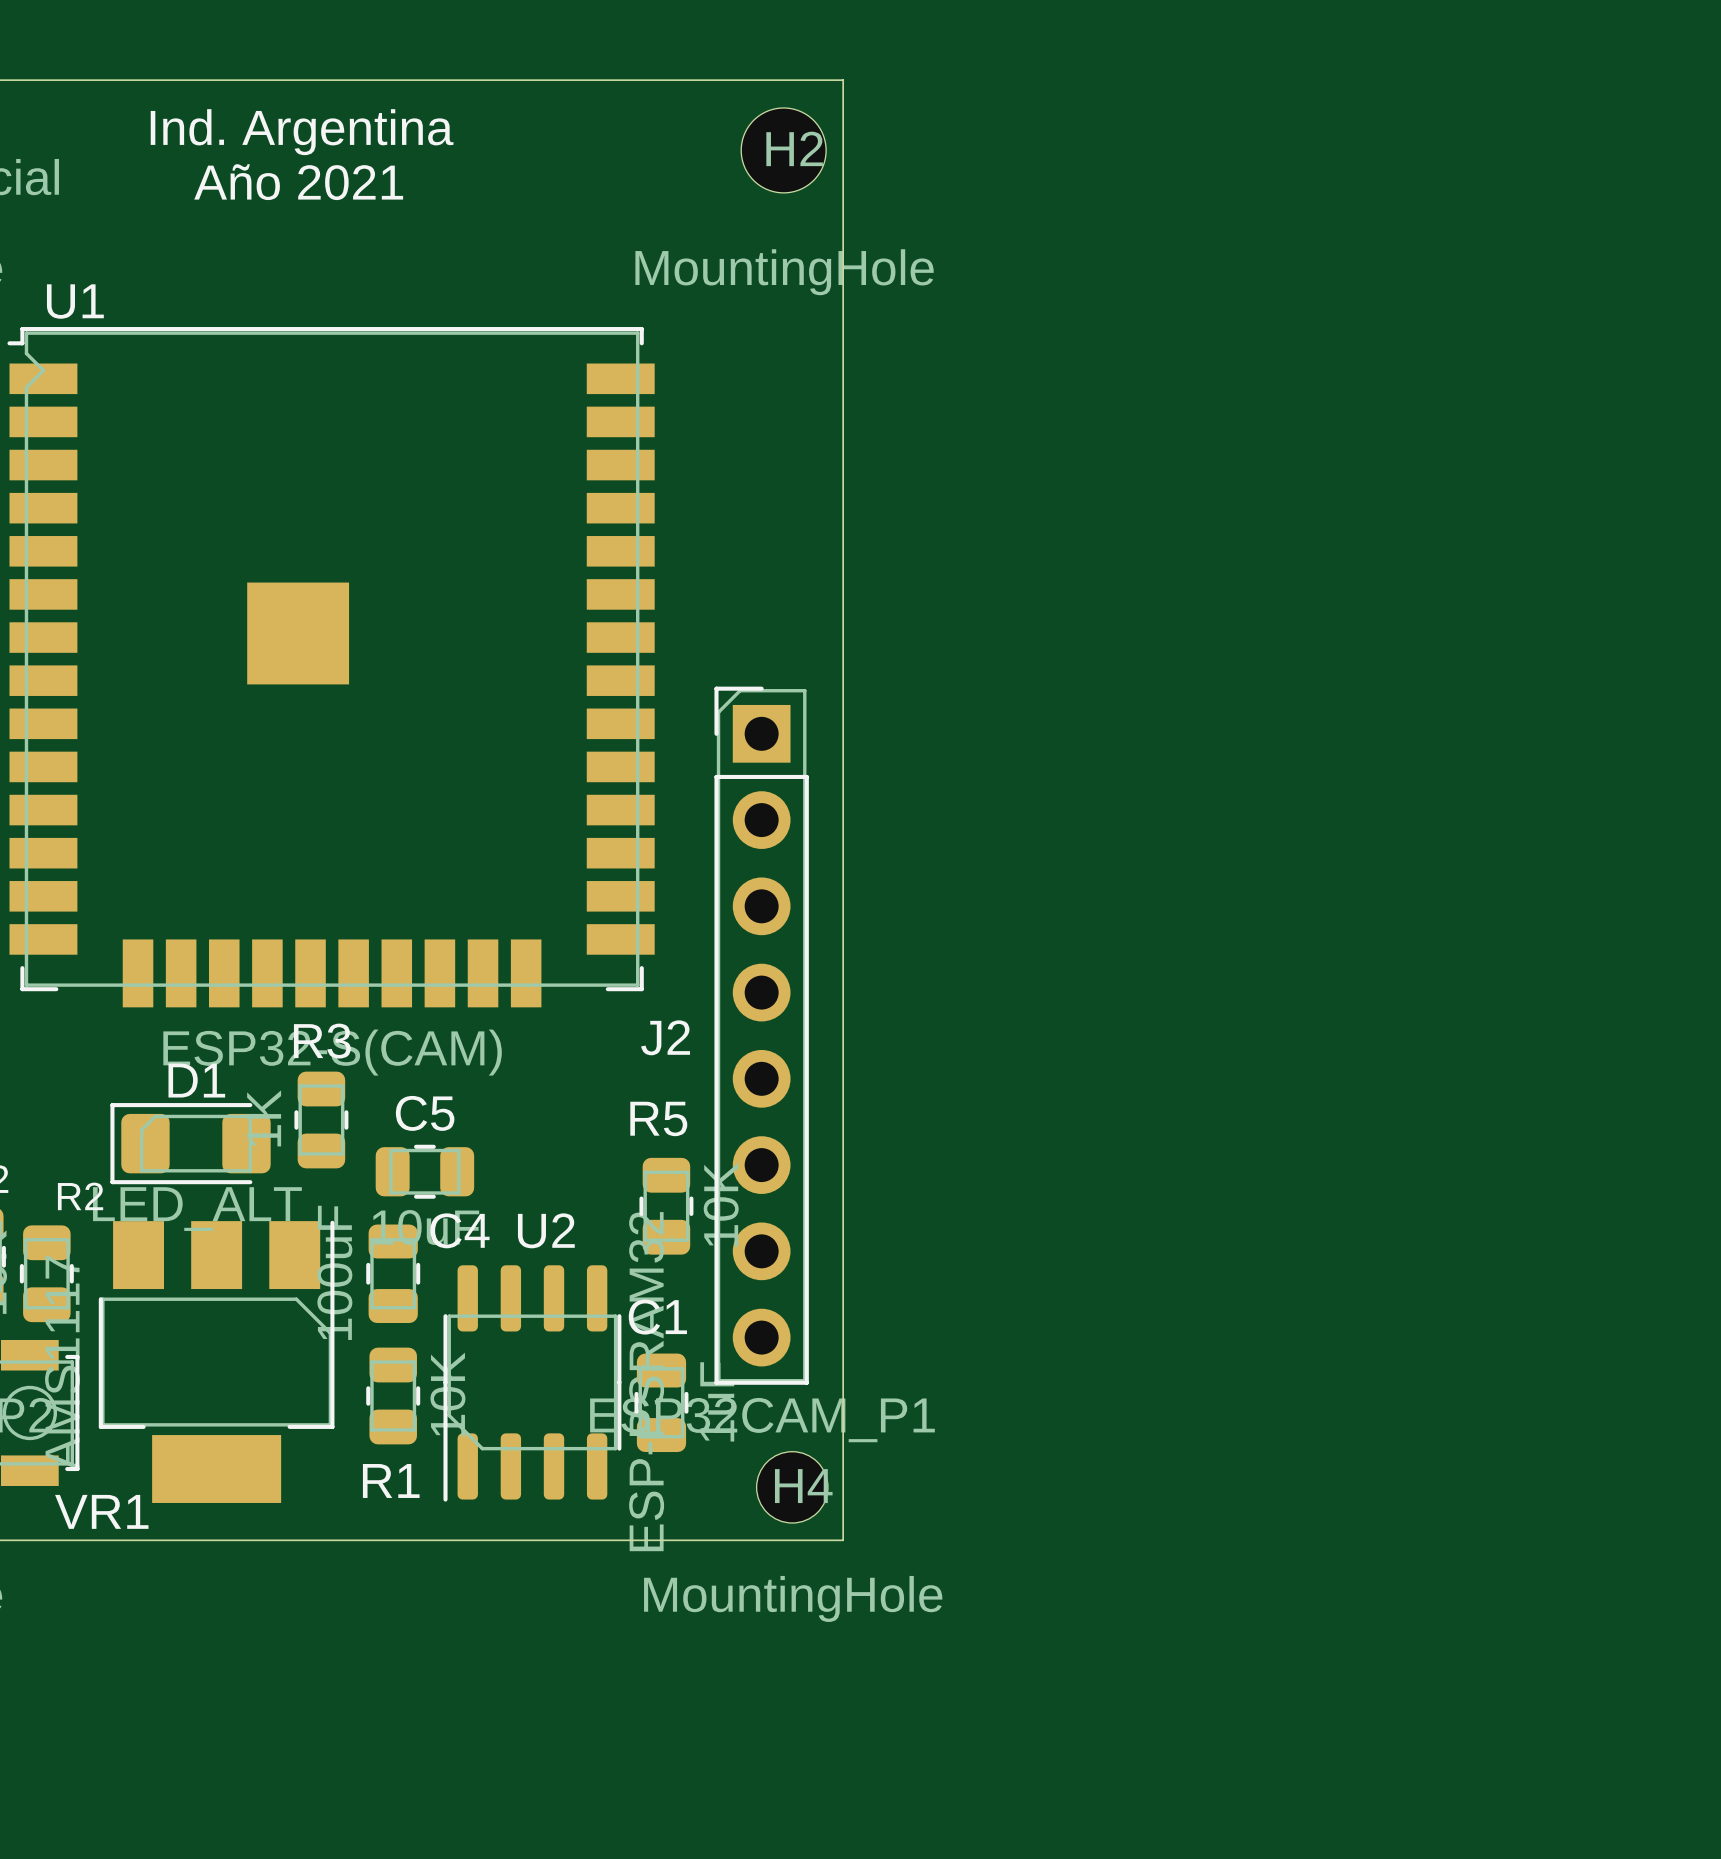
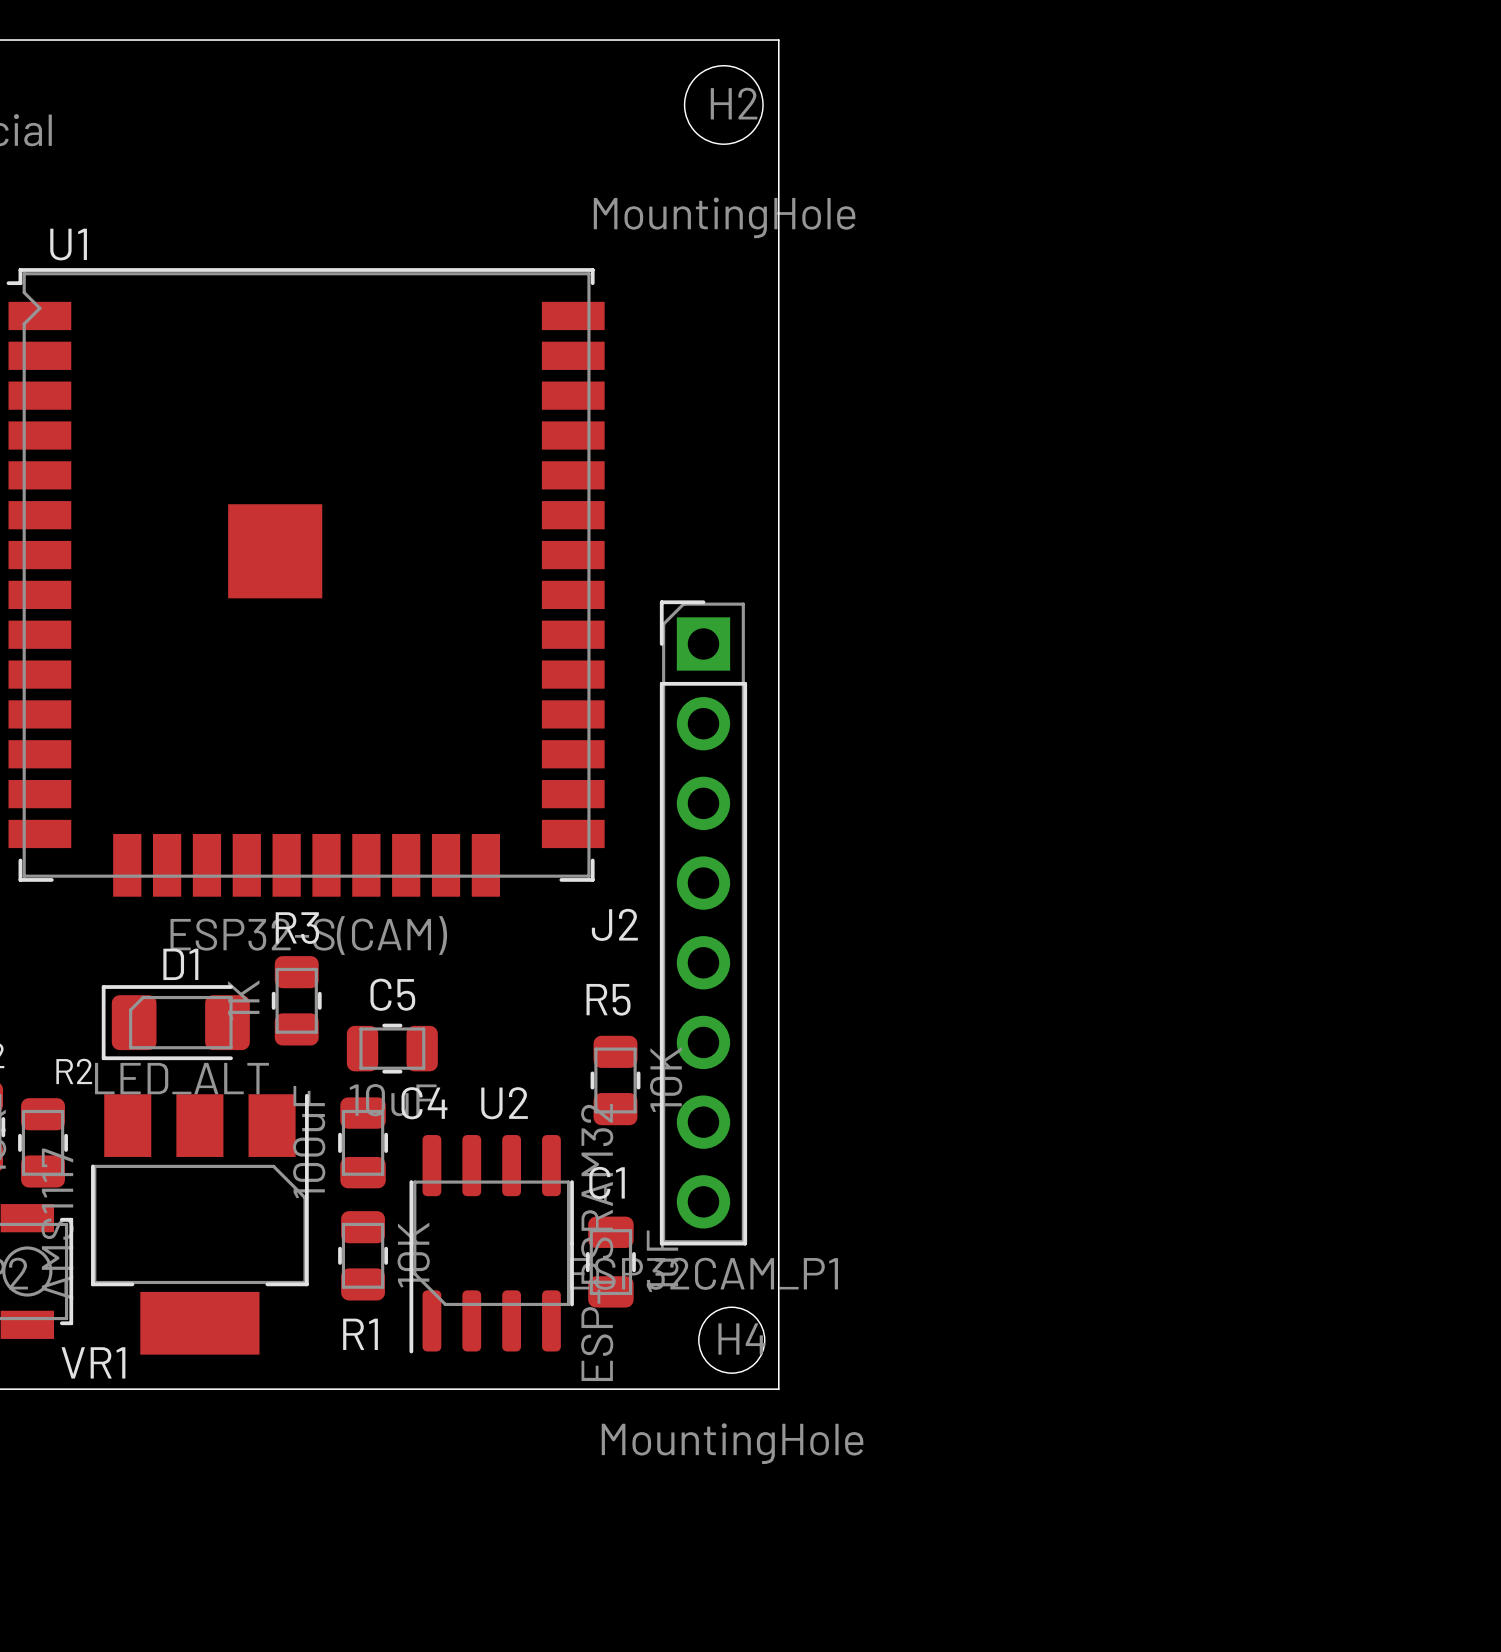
text: Ind. Argentina (302, 132) -> none
text: Año 2021 (298, 182) -> none

